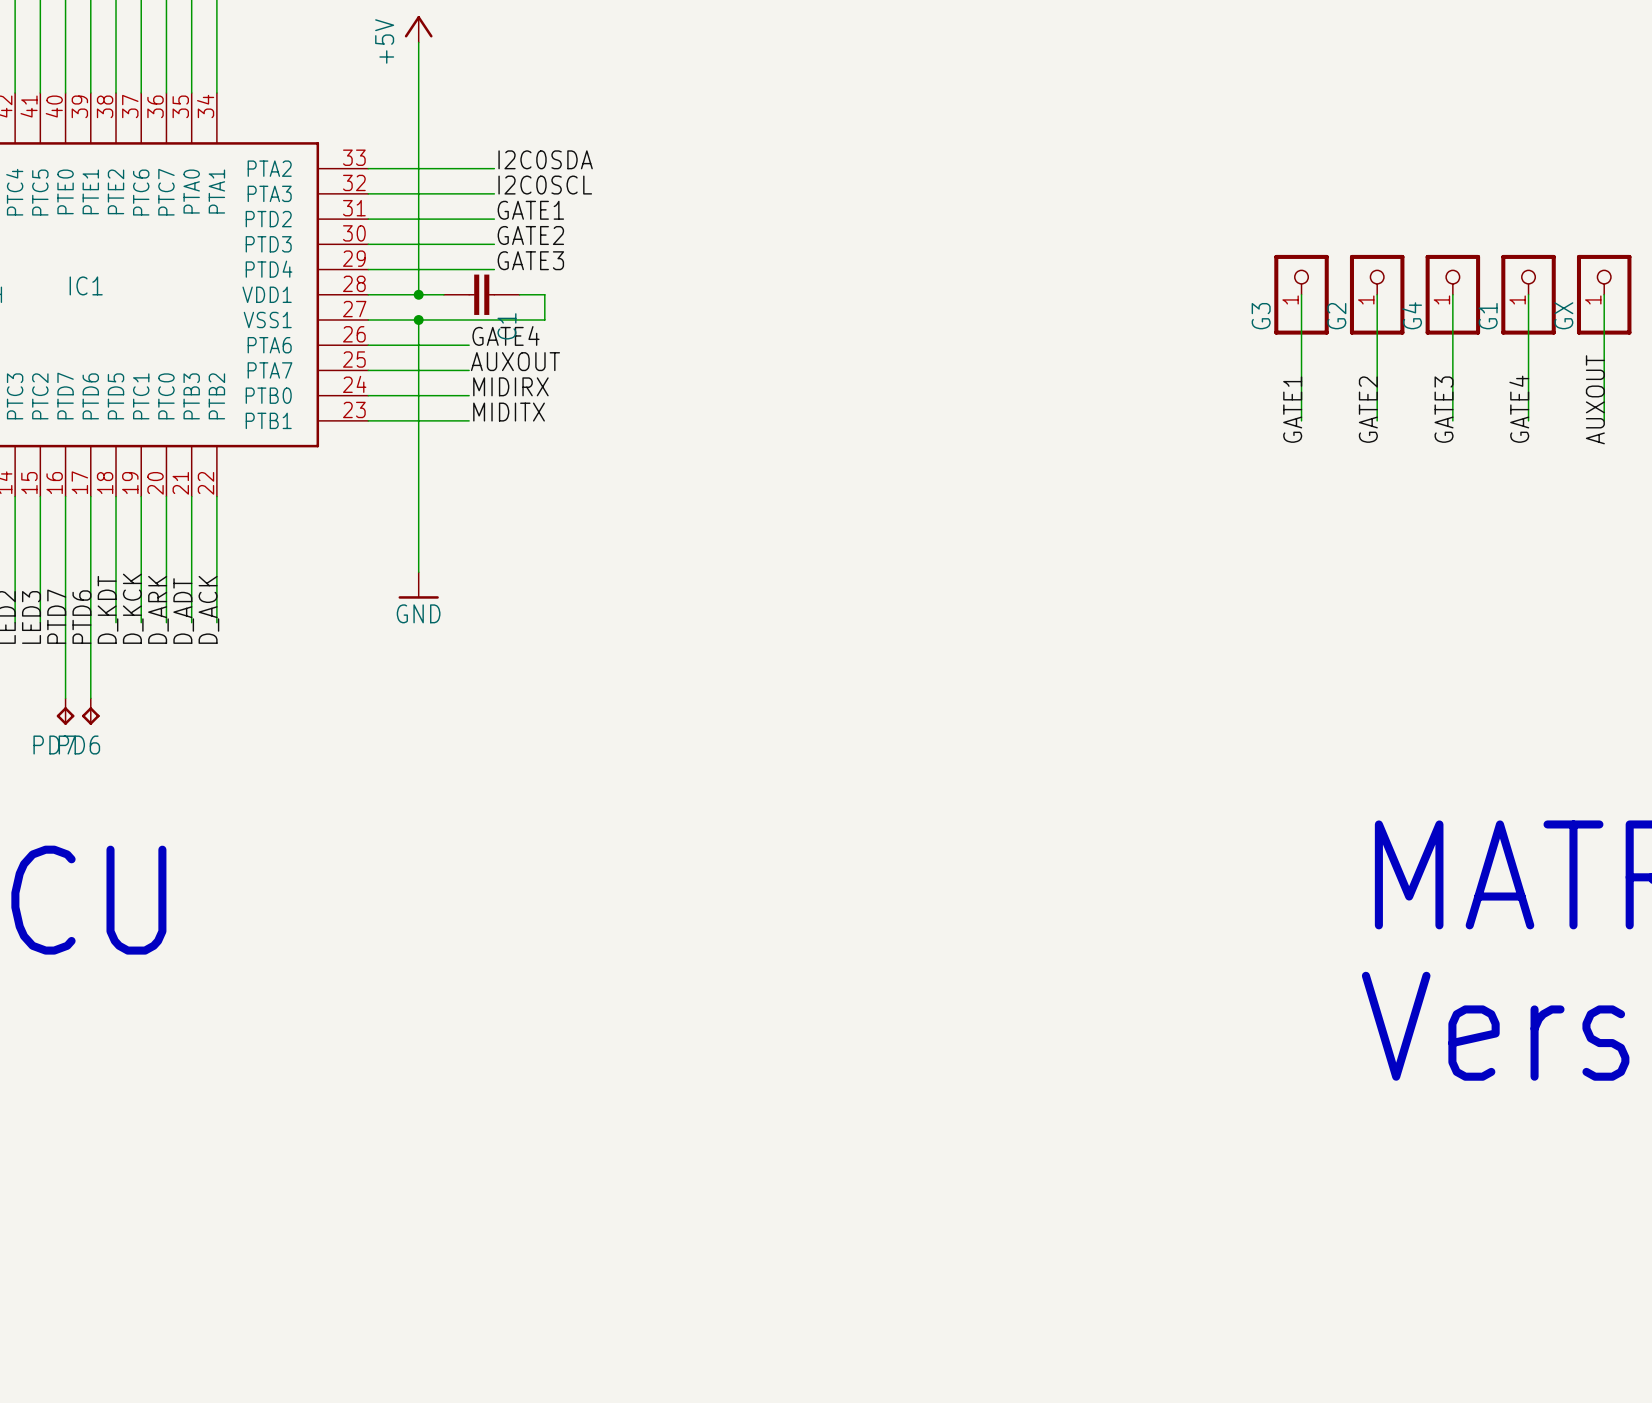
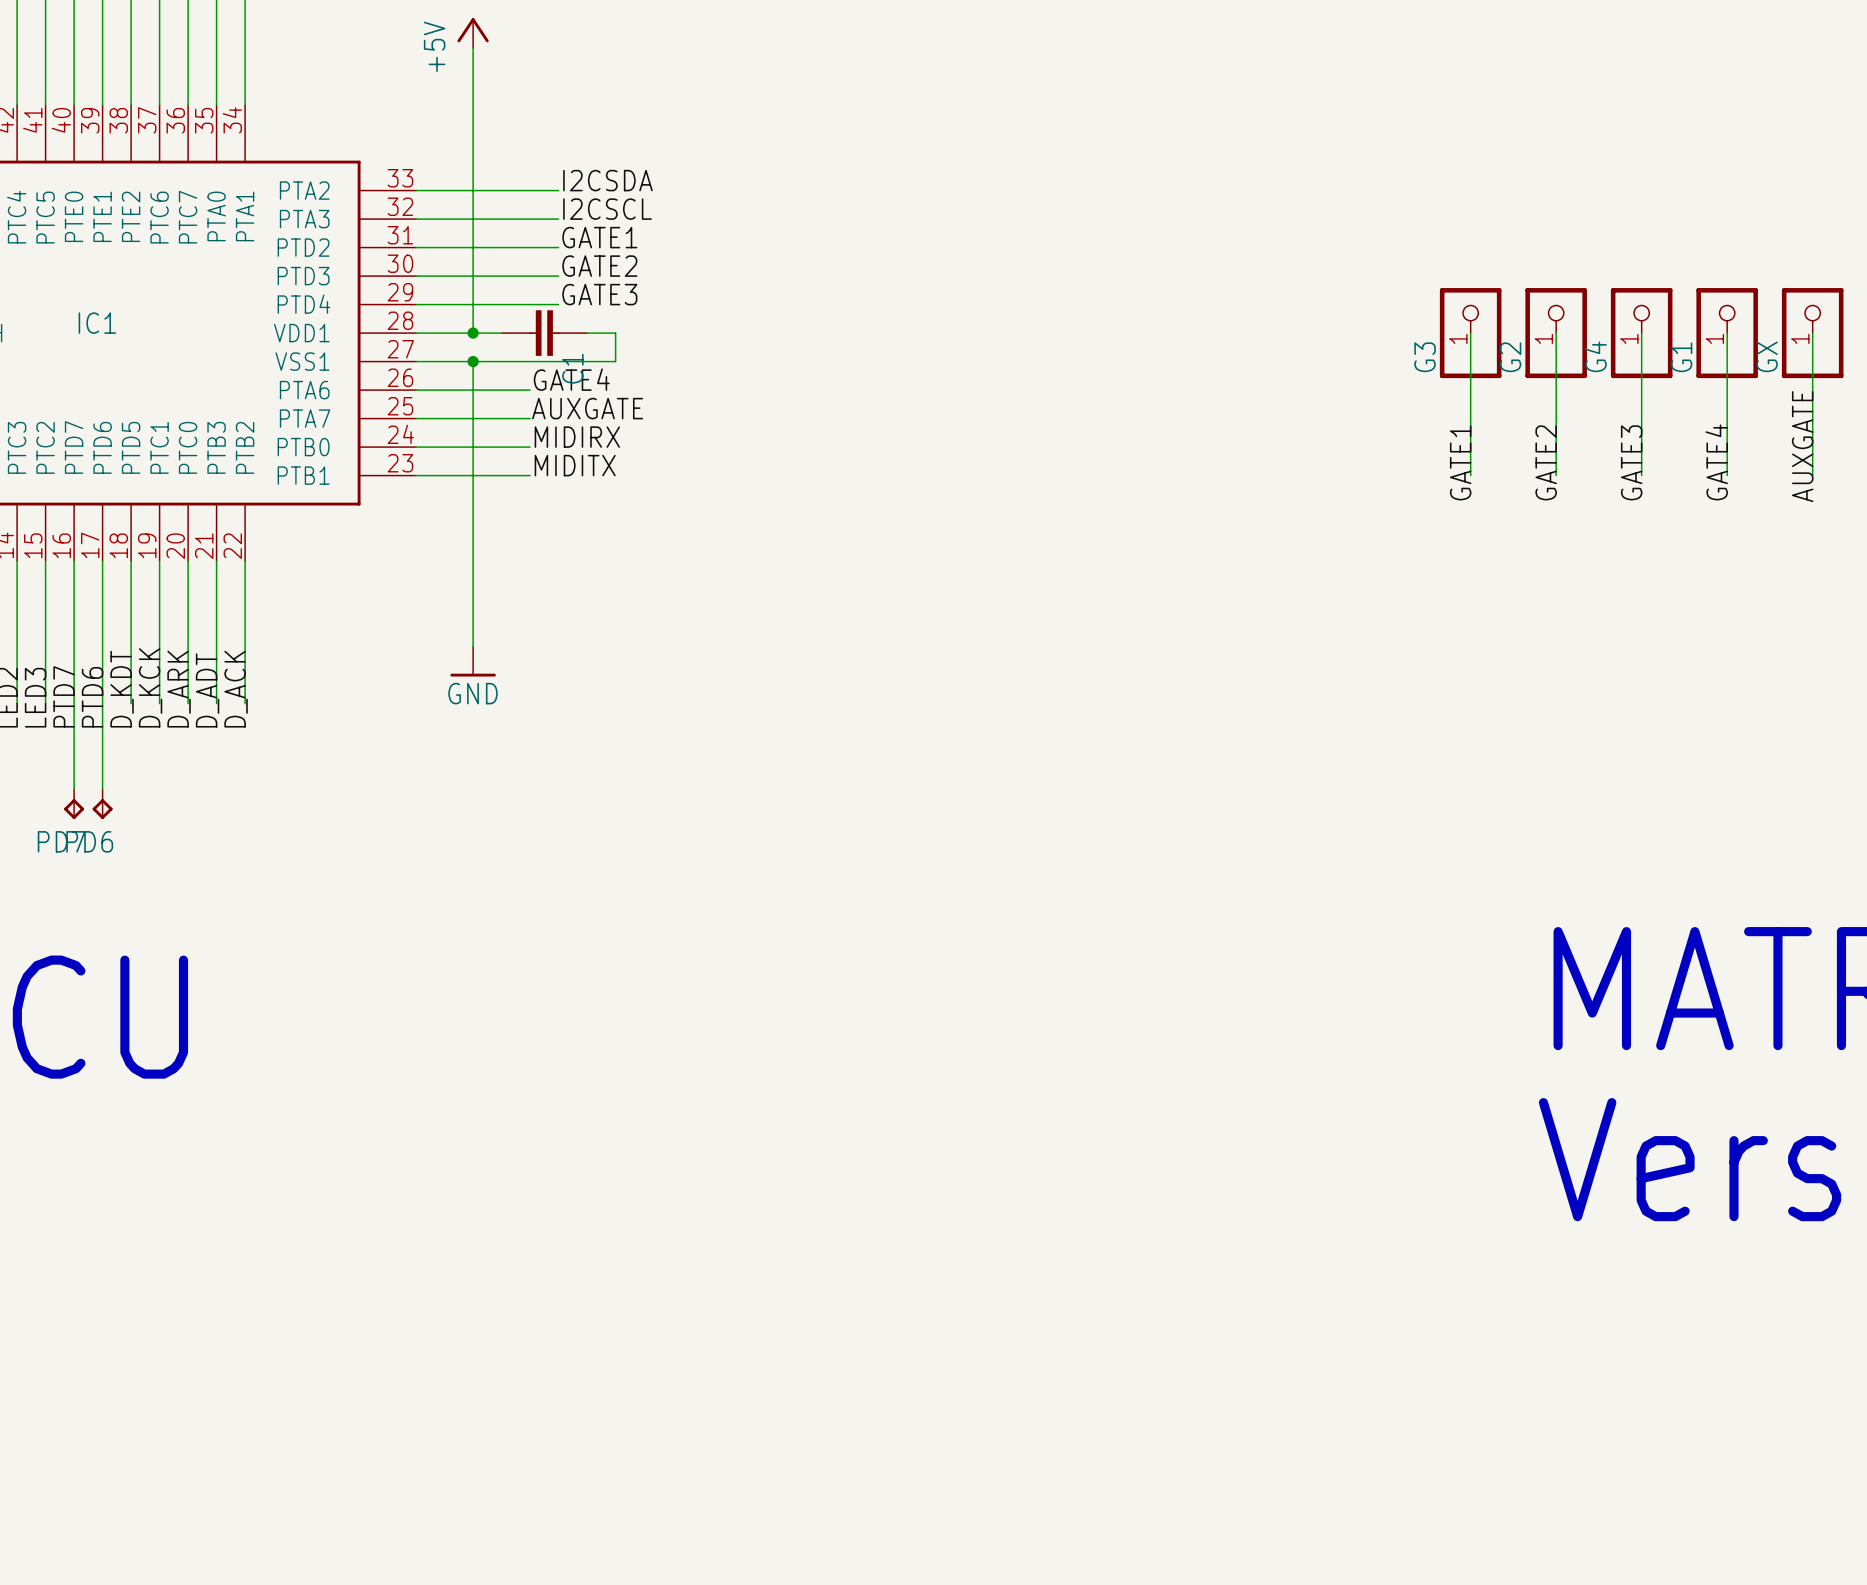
label: I2C0SDA (545, 159) -> I2CSDA (607, 180)
label: I2C0SCL (545, 185) -> I2CSCL (607, 209)
label: AUXOUT (515, 361) -> AUXGATE (587, 408)
label: AUXOUT (1595, 399) -> AUXGATE (1802, 446)

